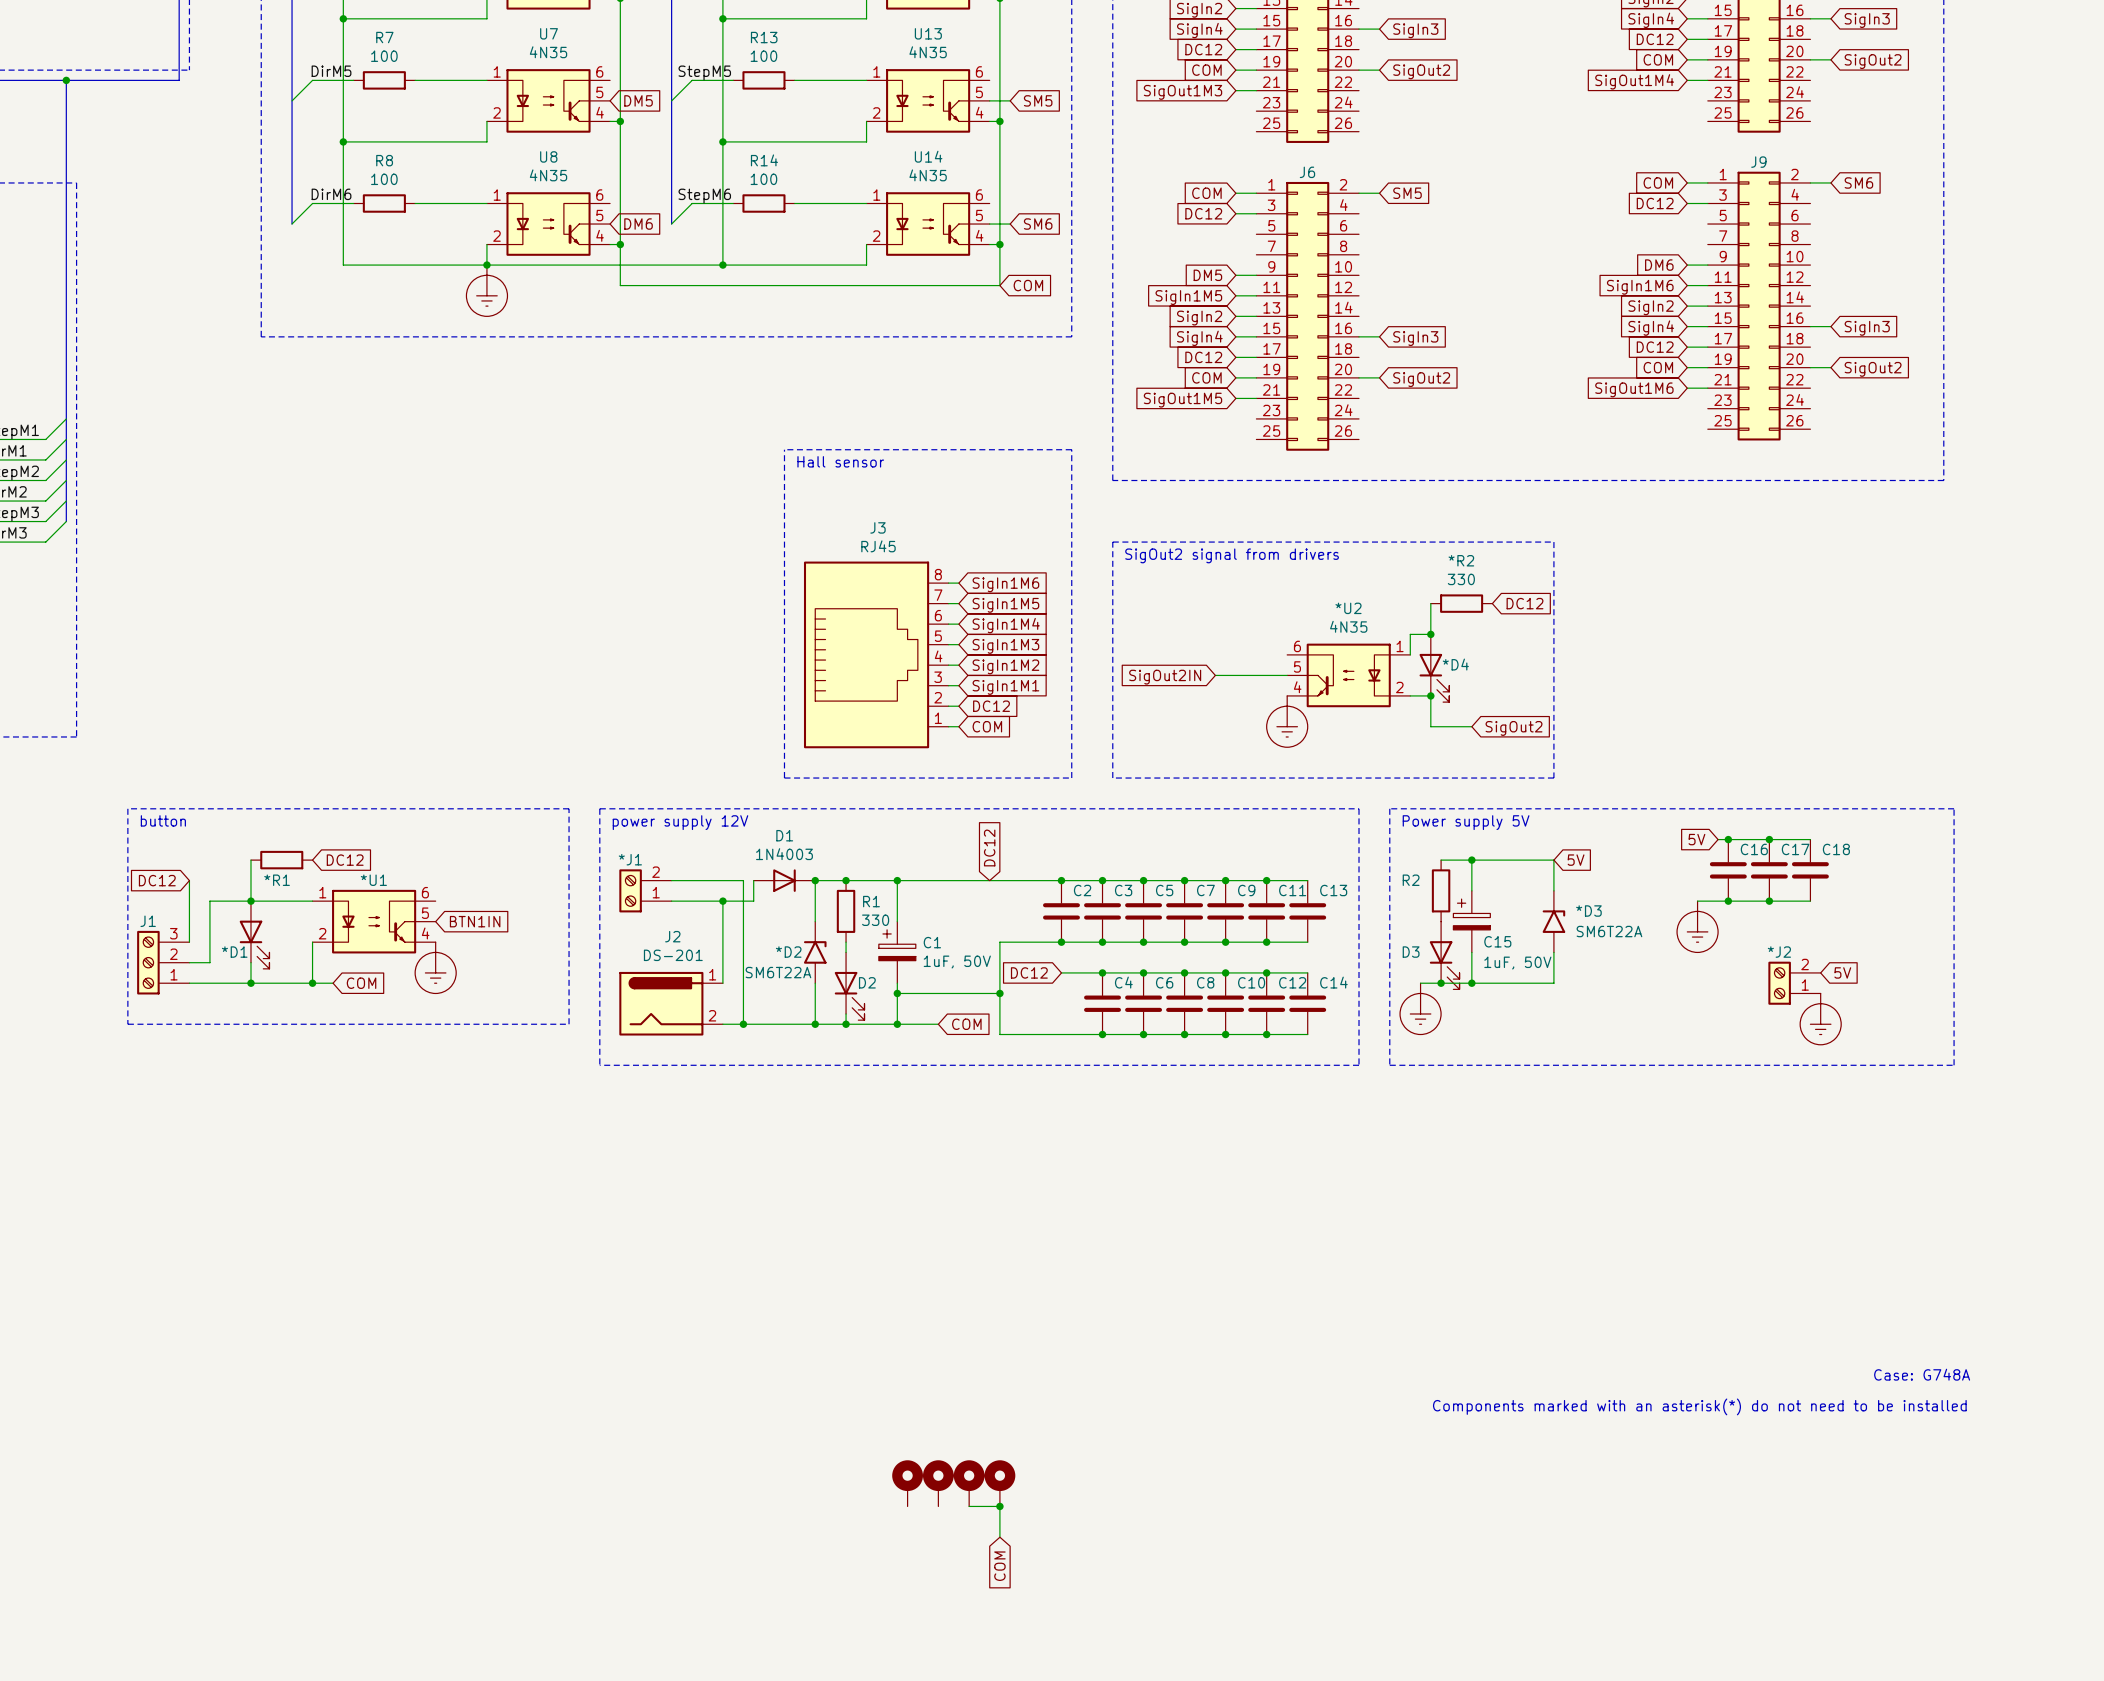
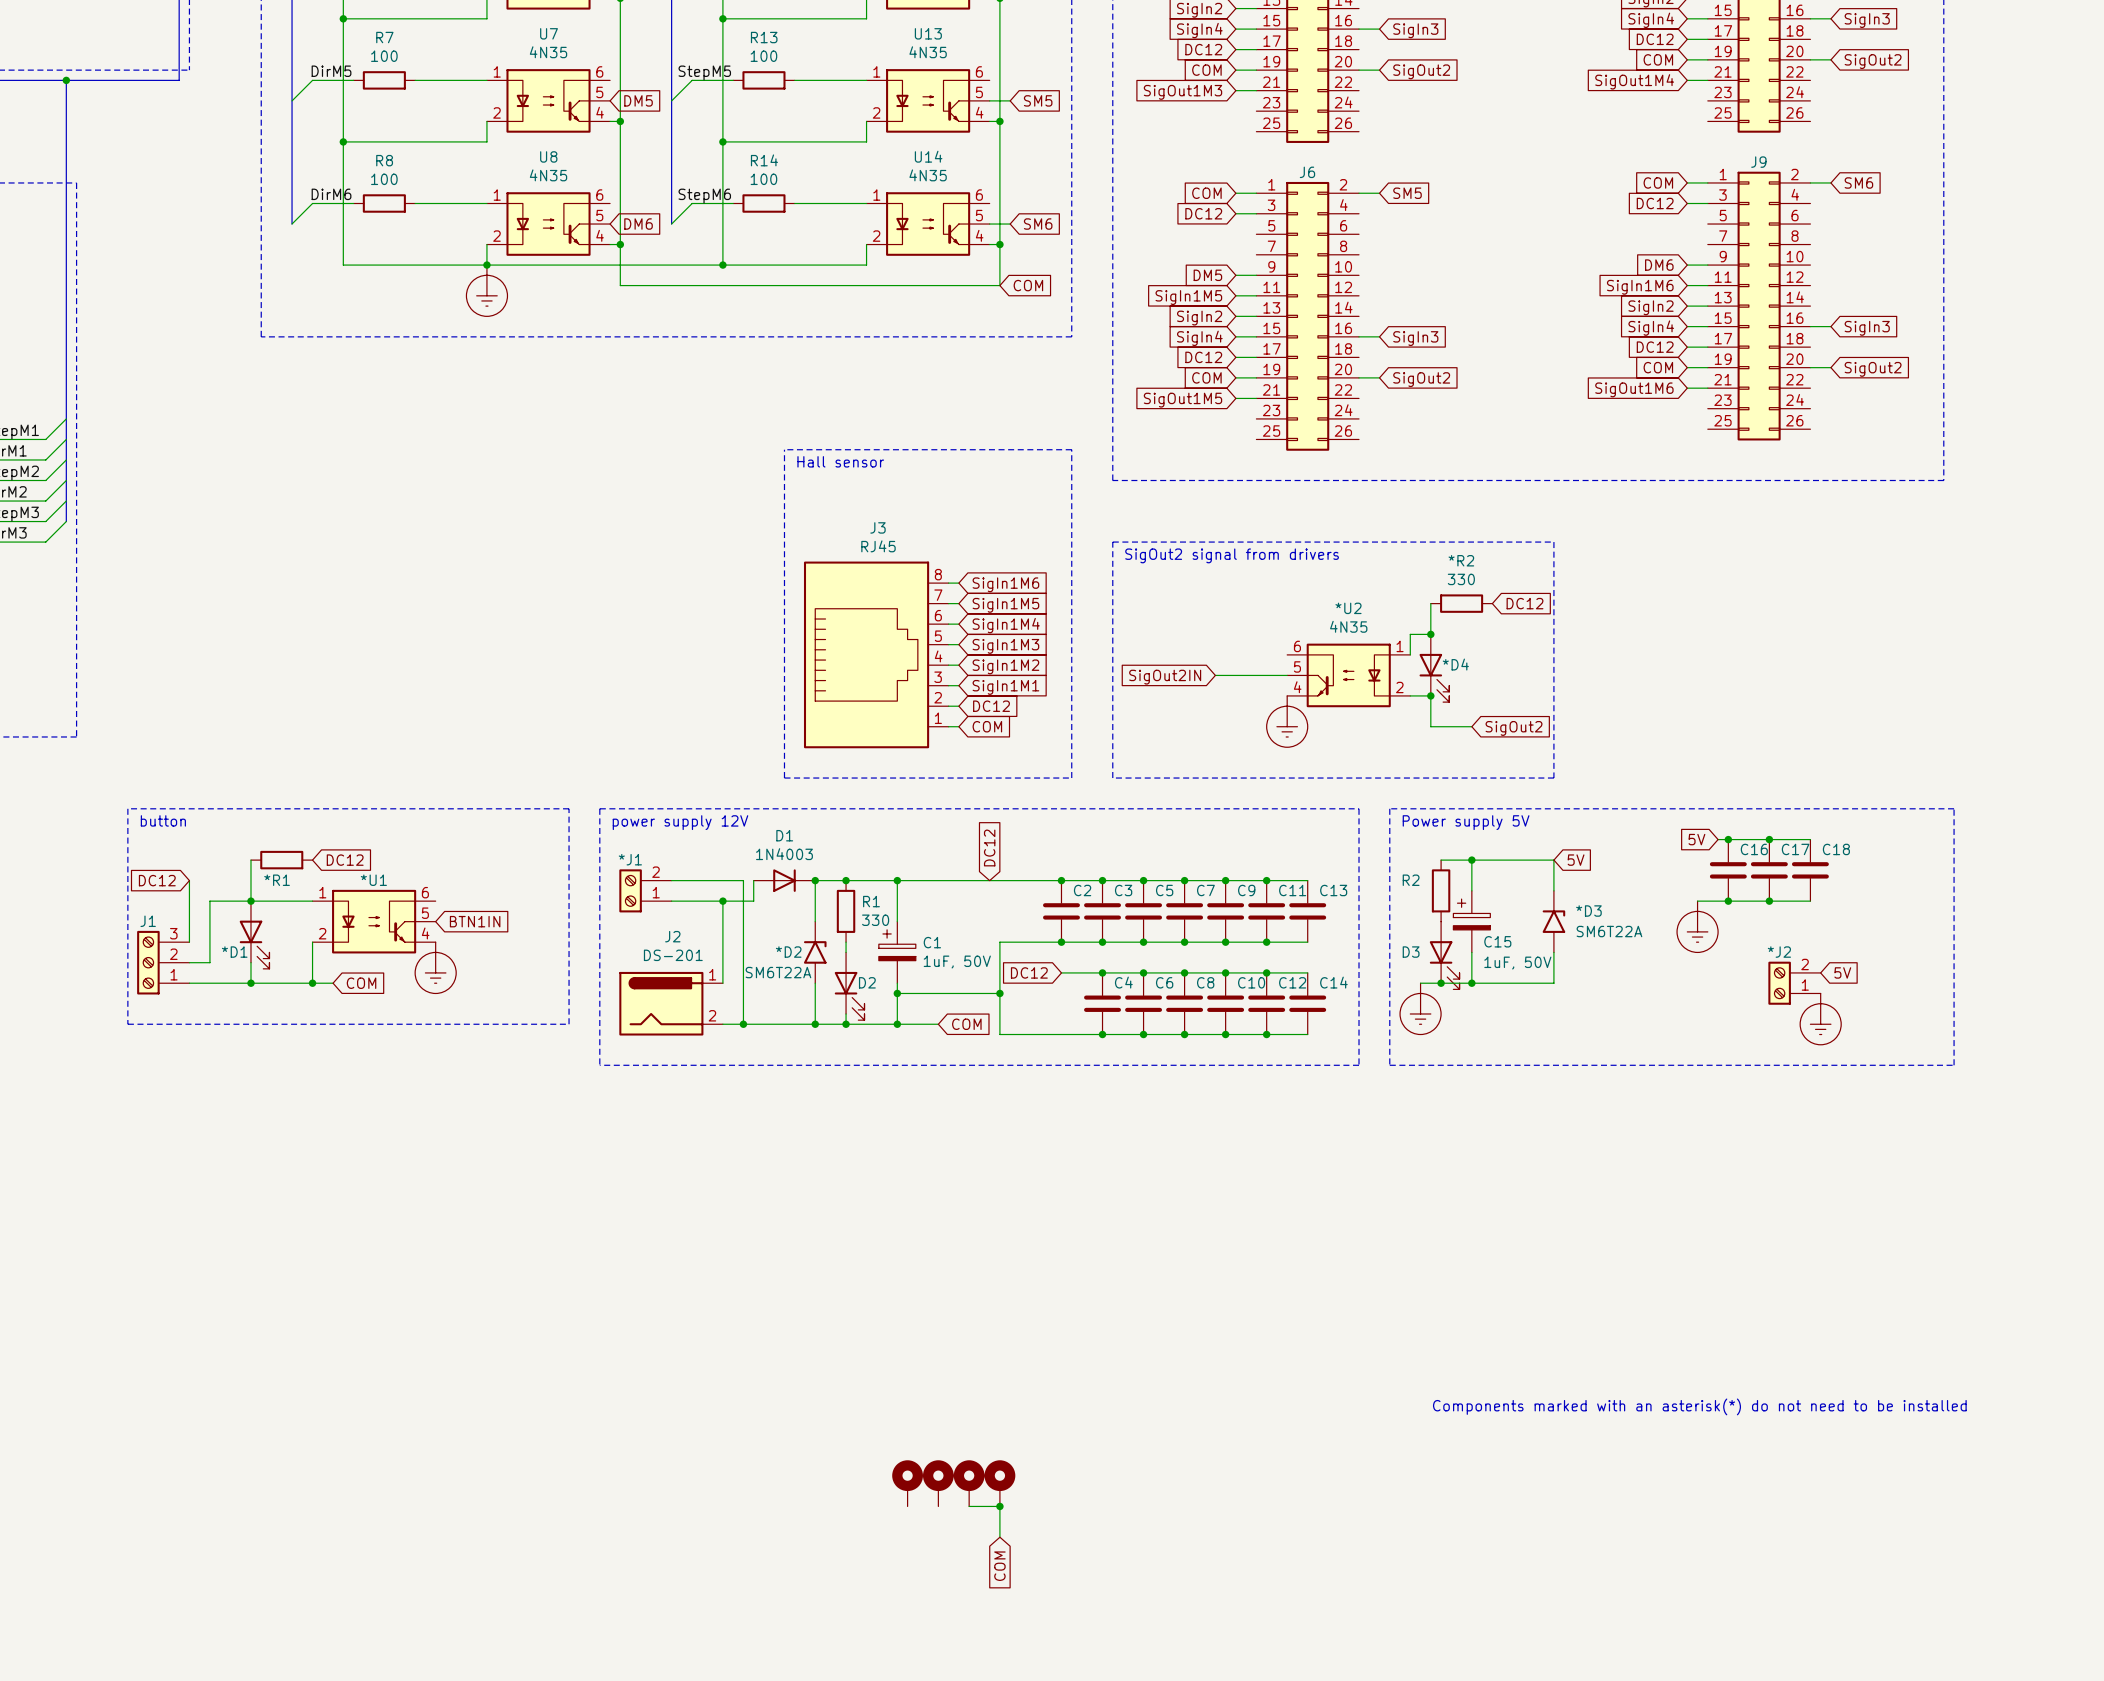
text: Case: G748A (1922, 1374) -> none

